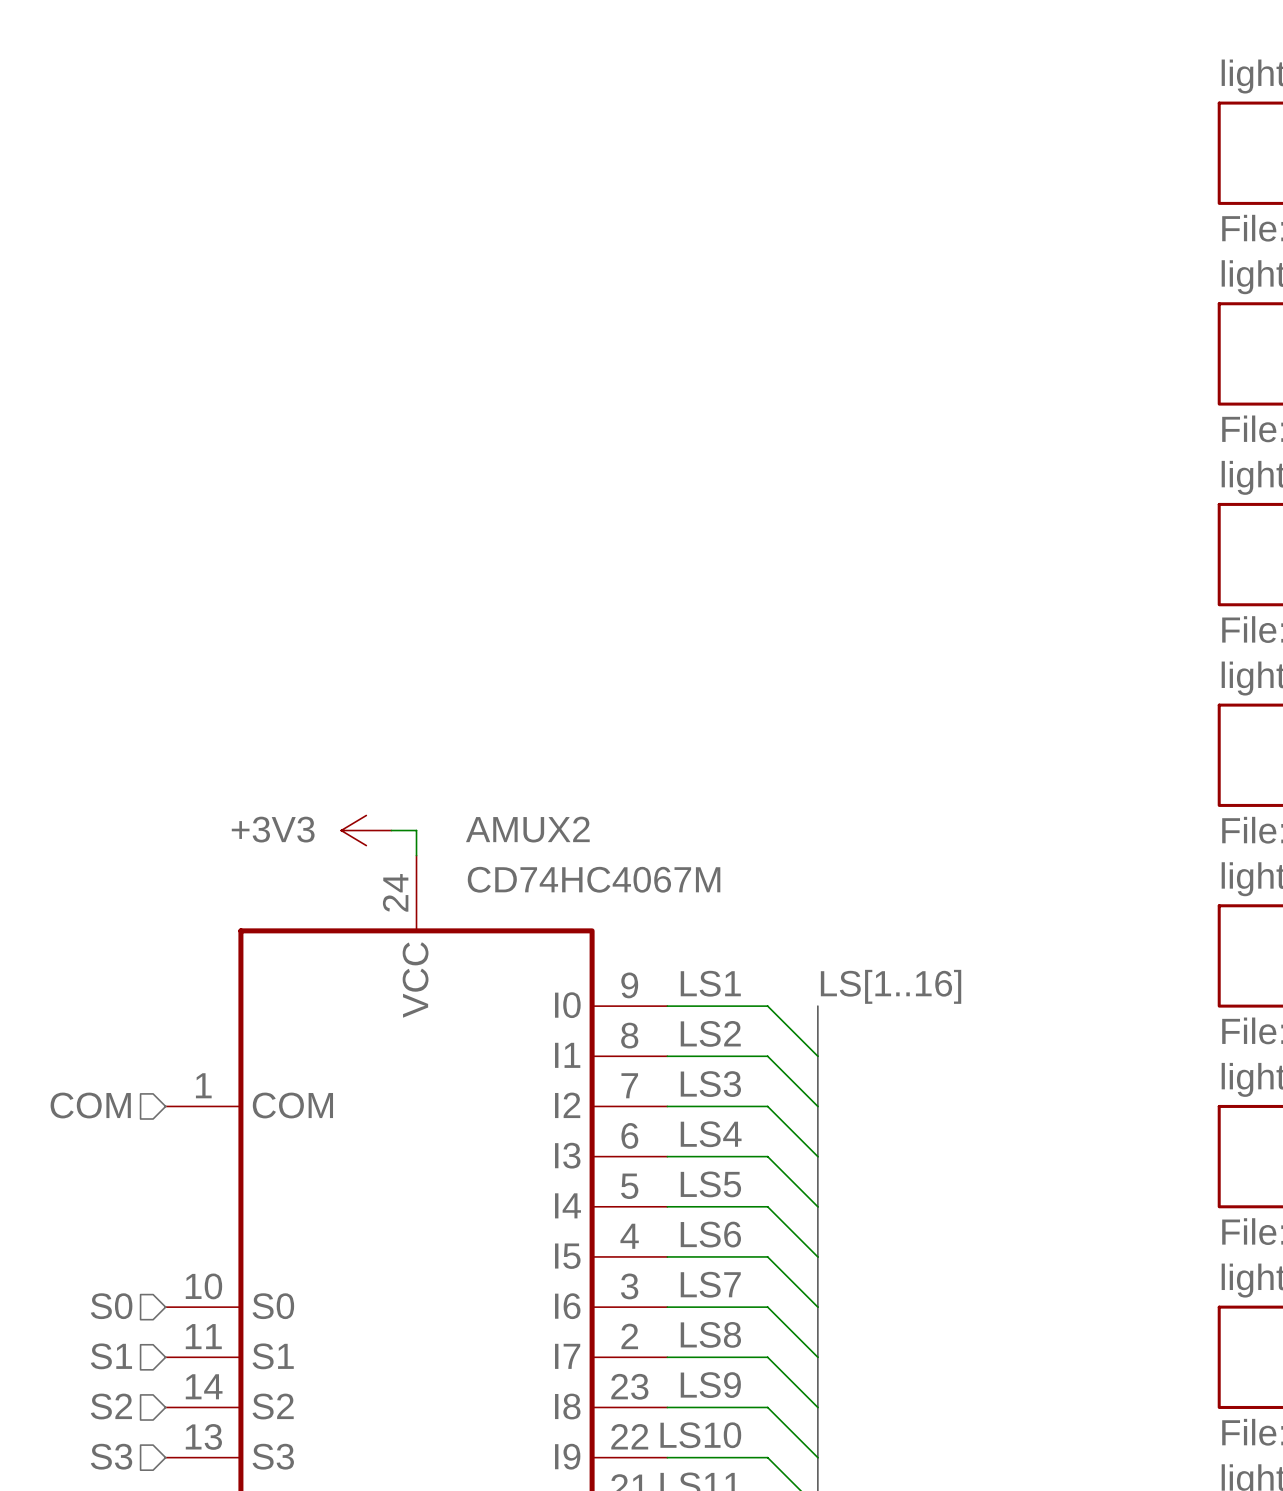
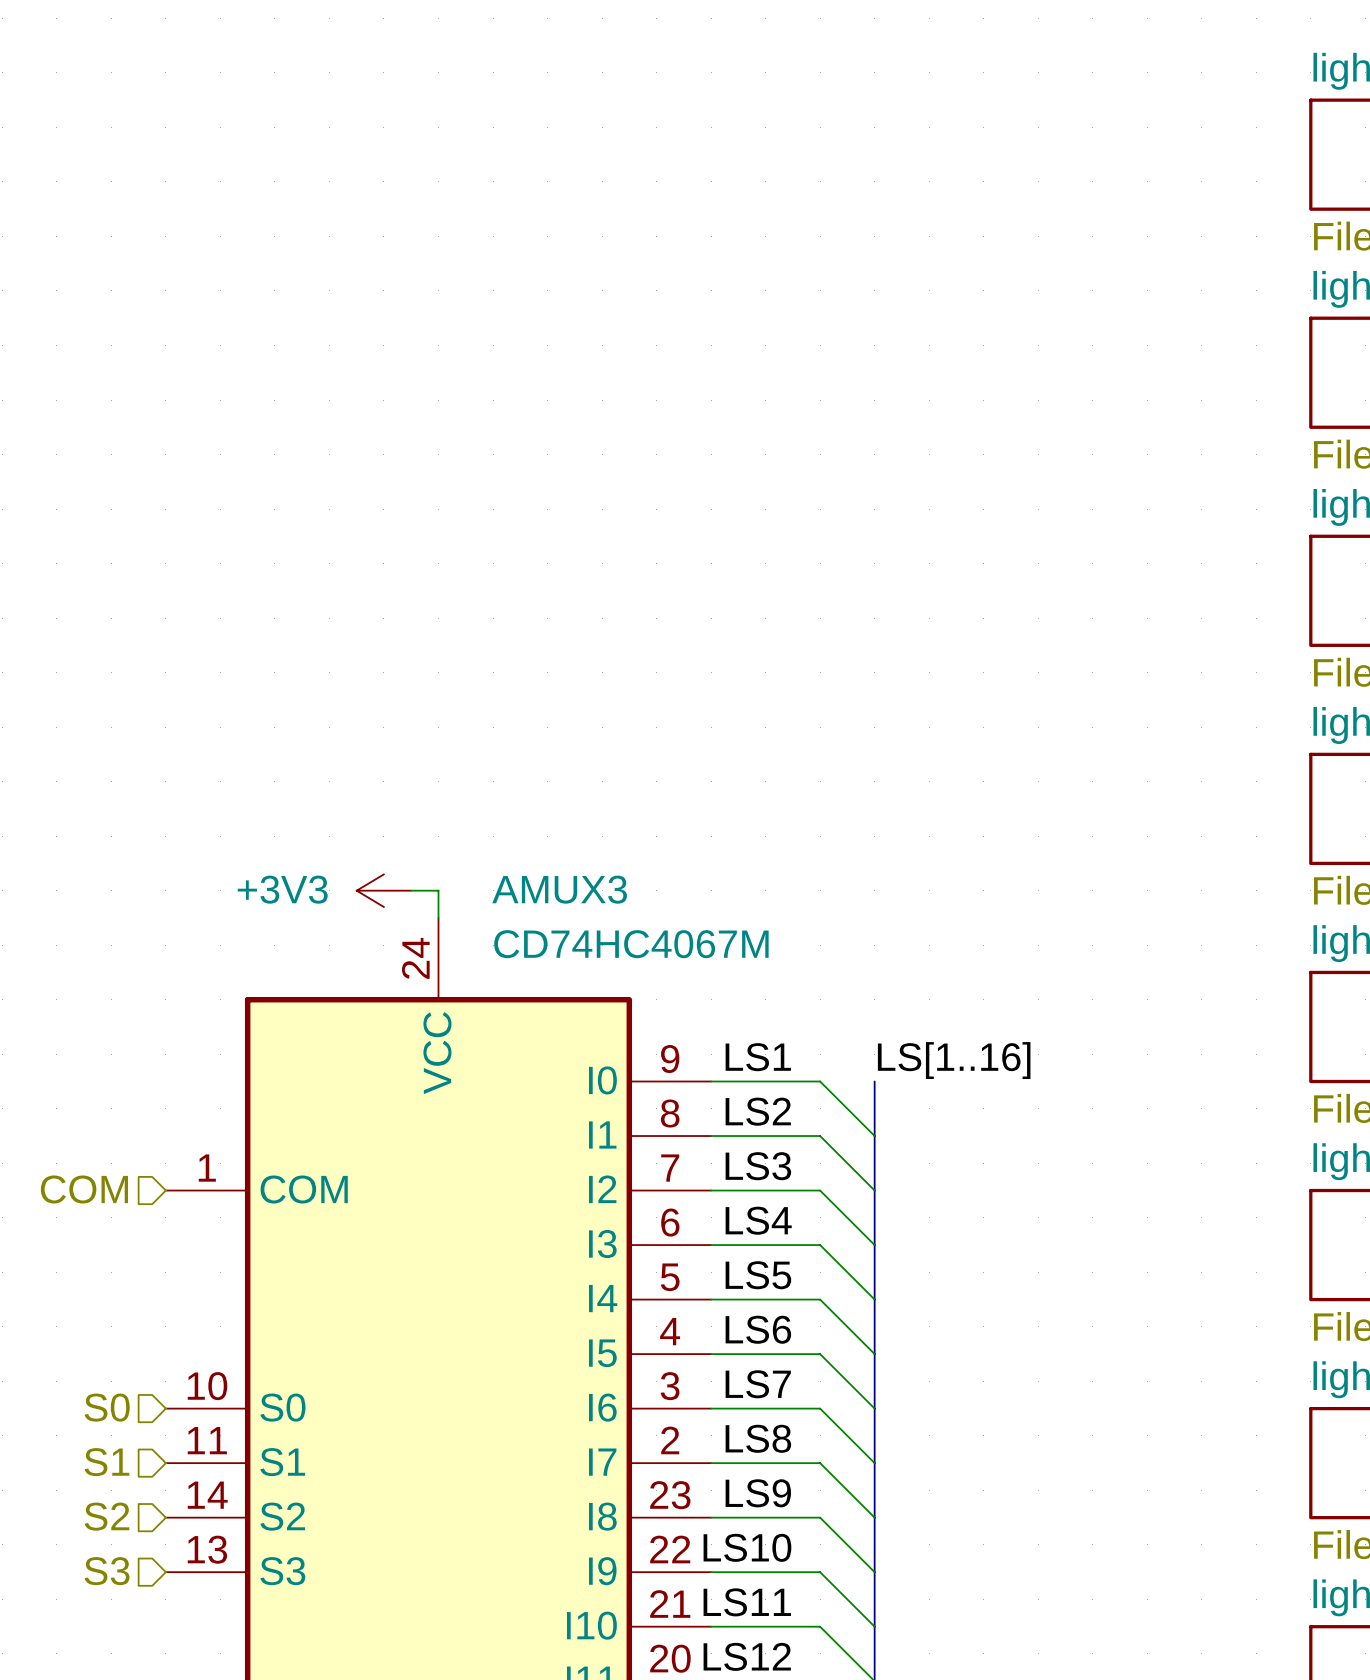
AMUX2 name: AMUX2 (527, 829) -> AMUX3 (559, 889)

